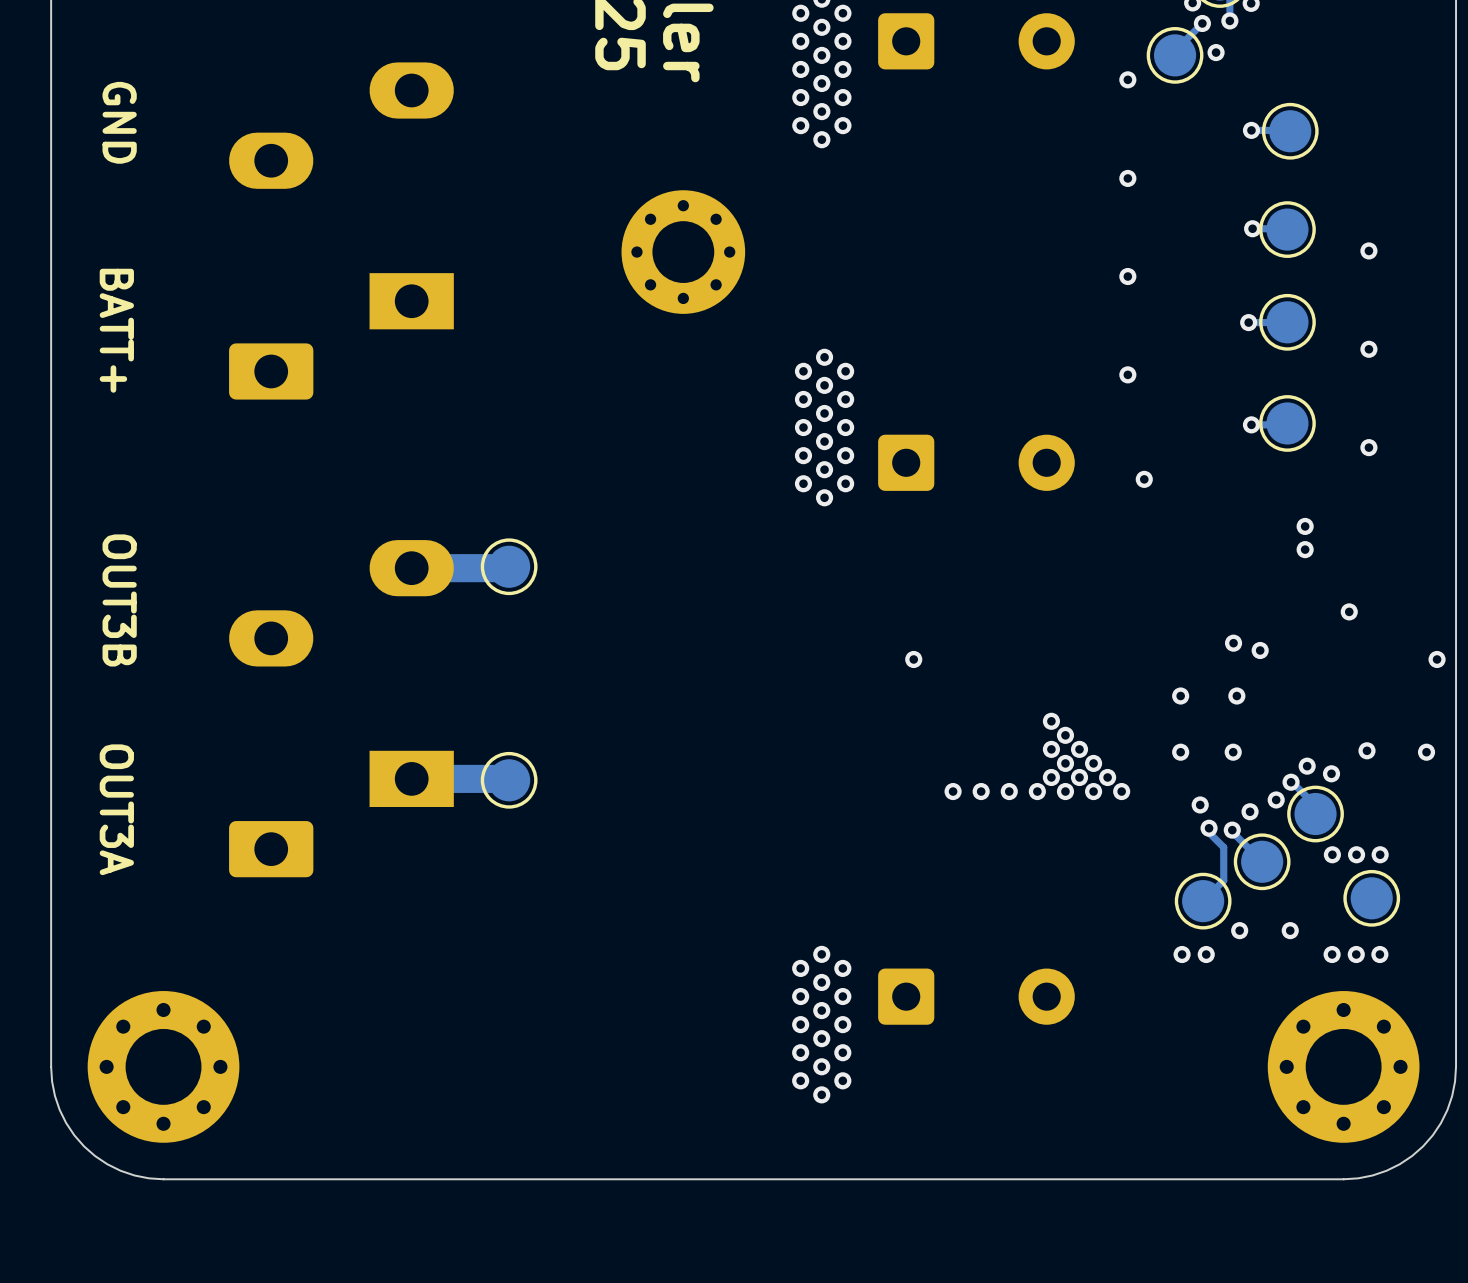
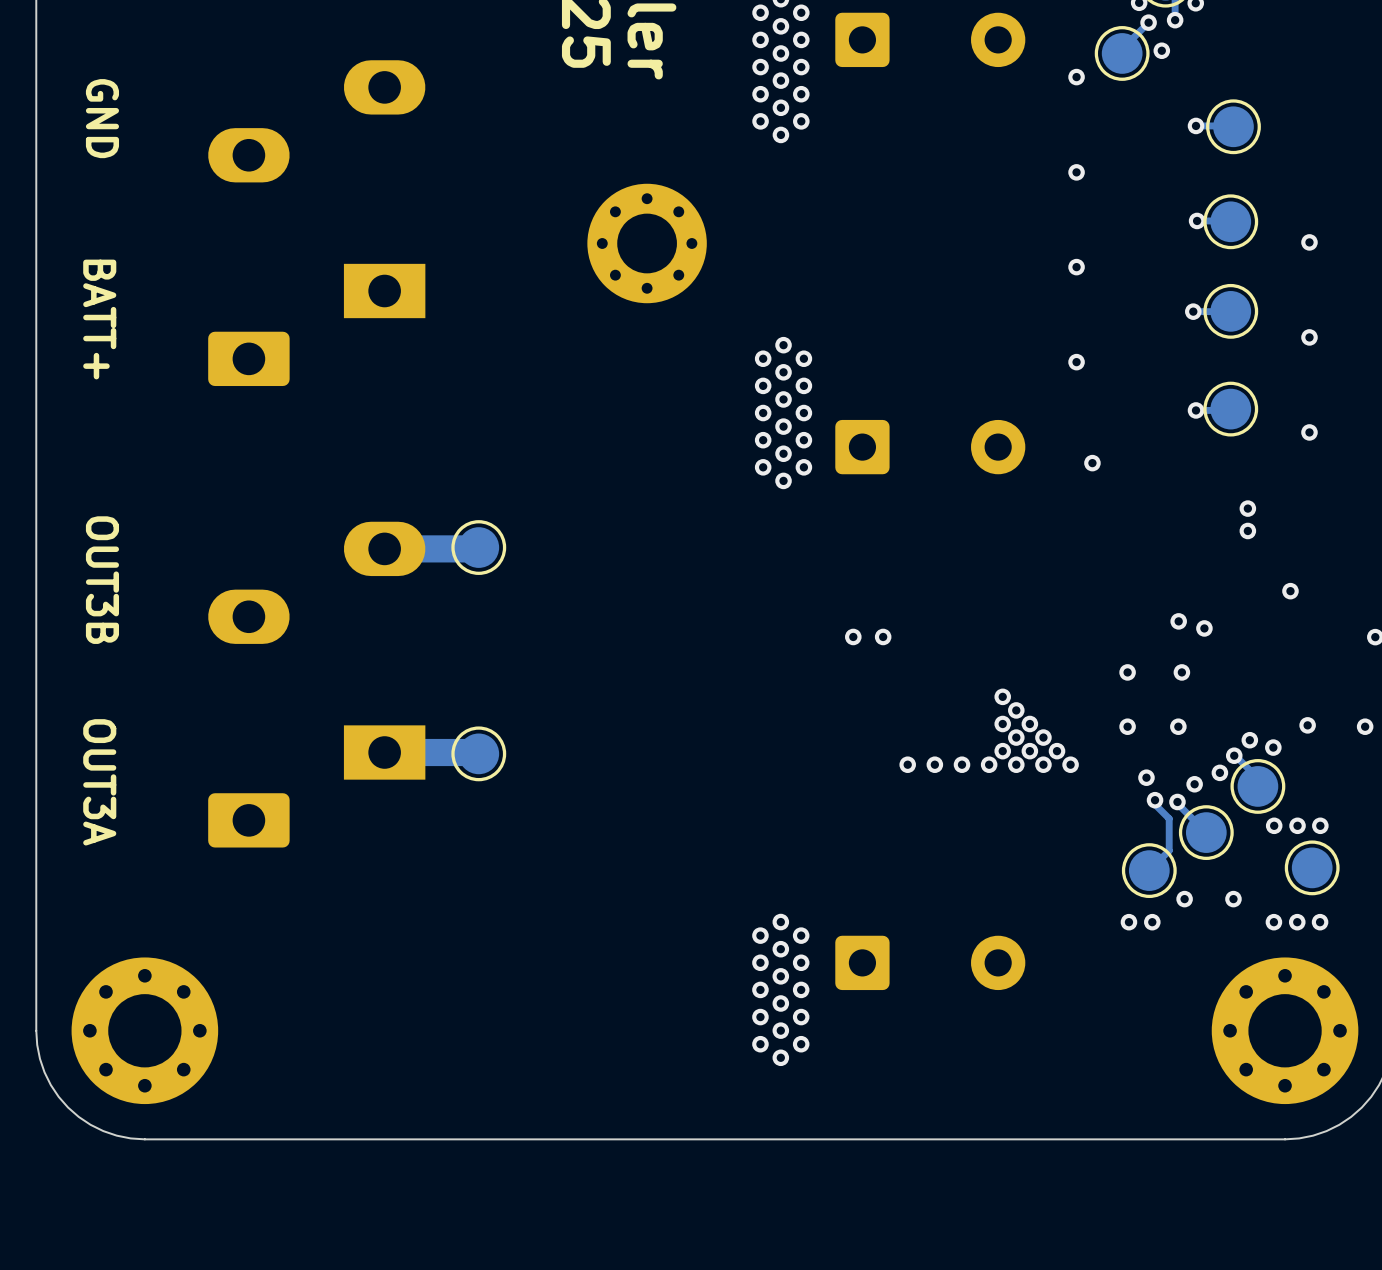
via: none -> (853, 636)
via: (913, 659) -> none
via: none -> (883, 636)

